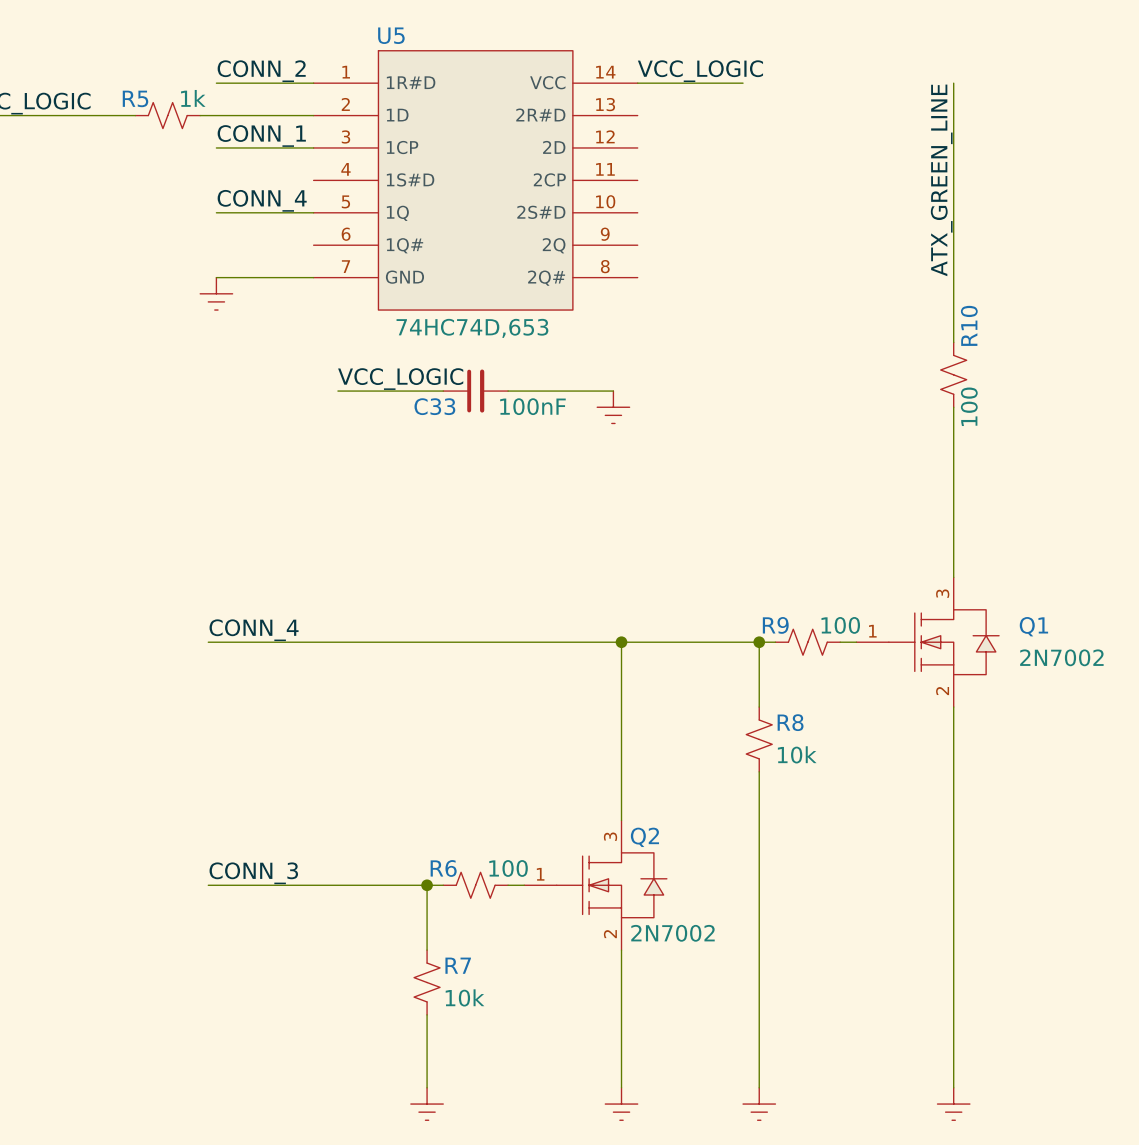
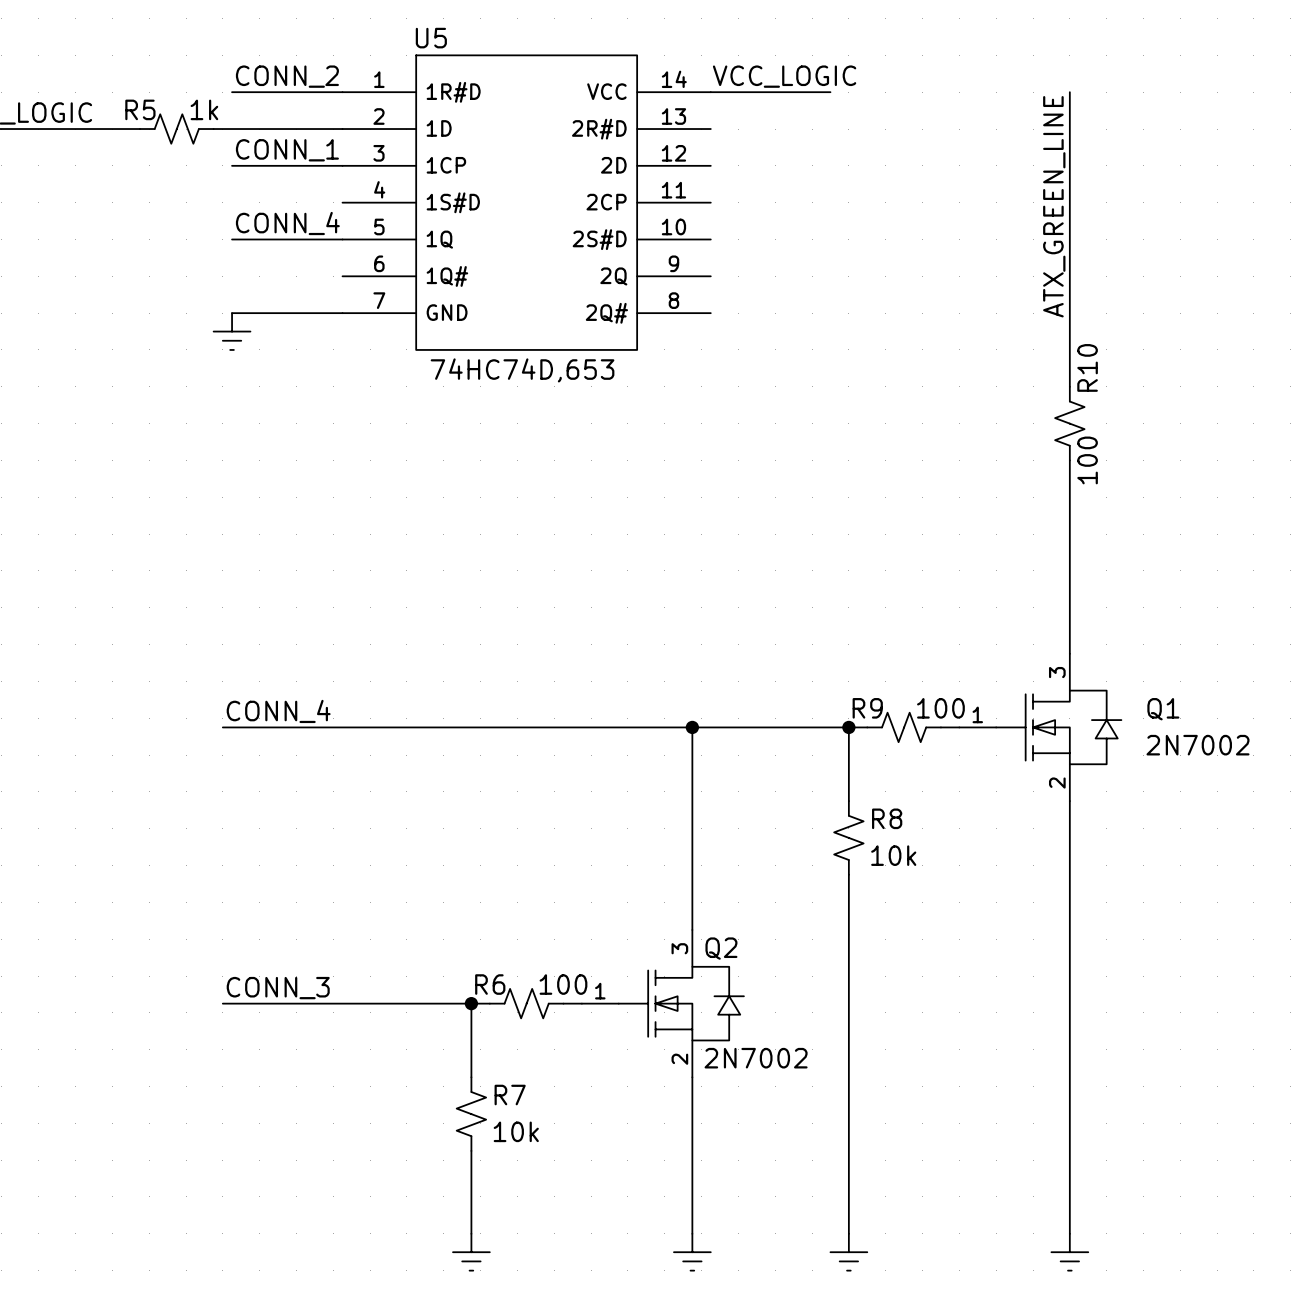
label: VCC_LOGIC (400, 379) -> none
wire: (337, 391) (443, 391) -> none
C33: 100nF (475, 391) -> none
wire: (508, 391) (613, 391) -> none
power symbol: (613, 407) -> none

